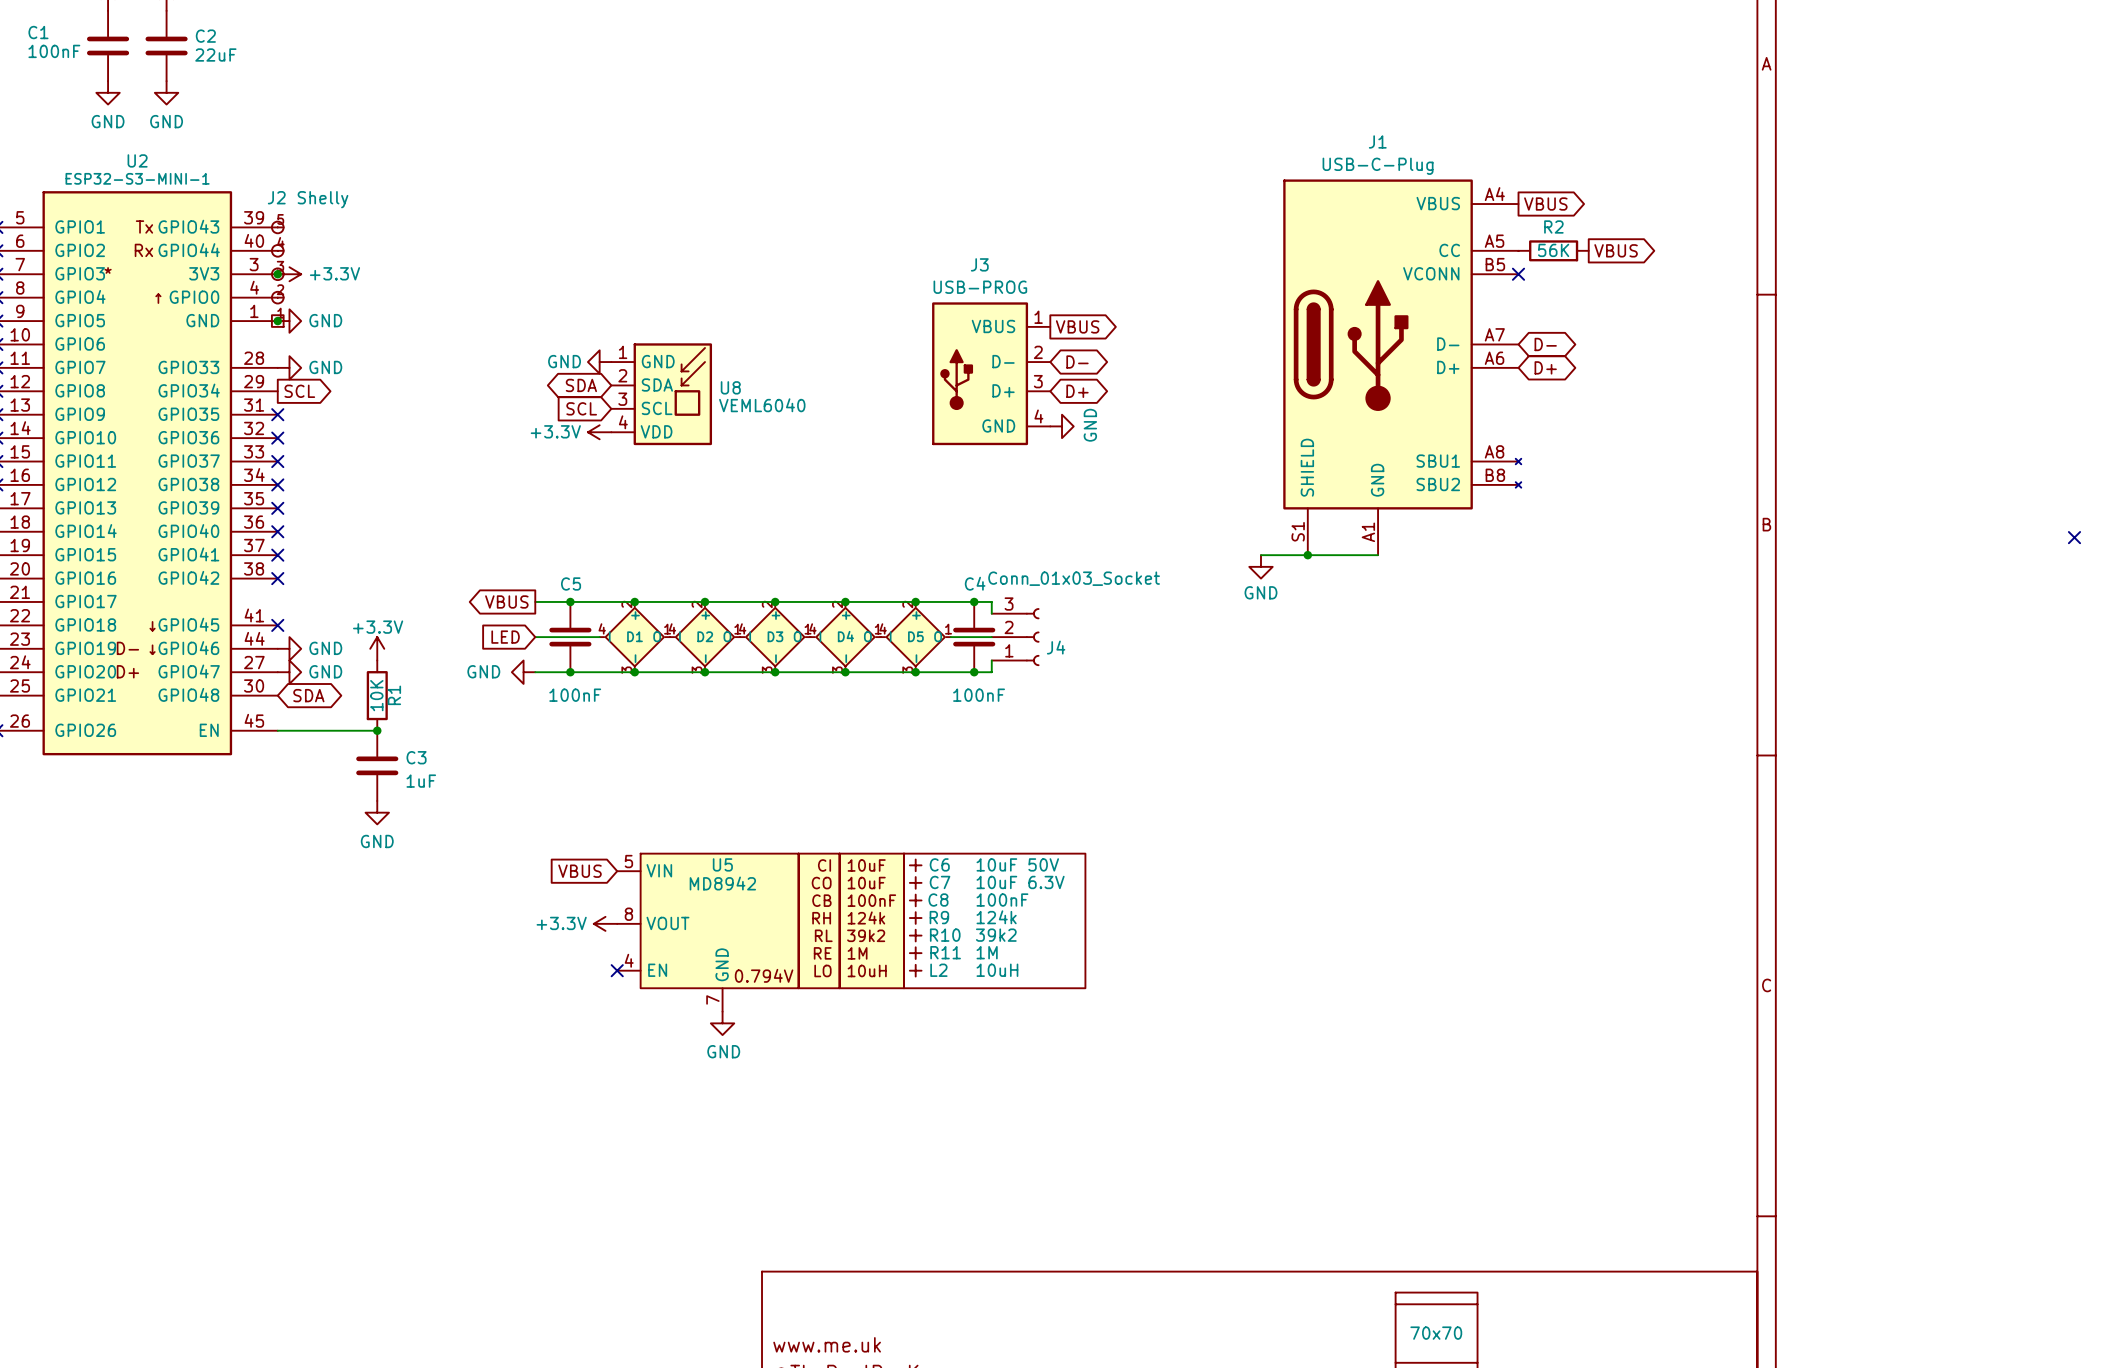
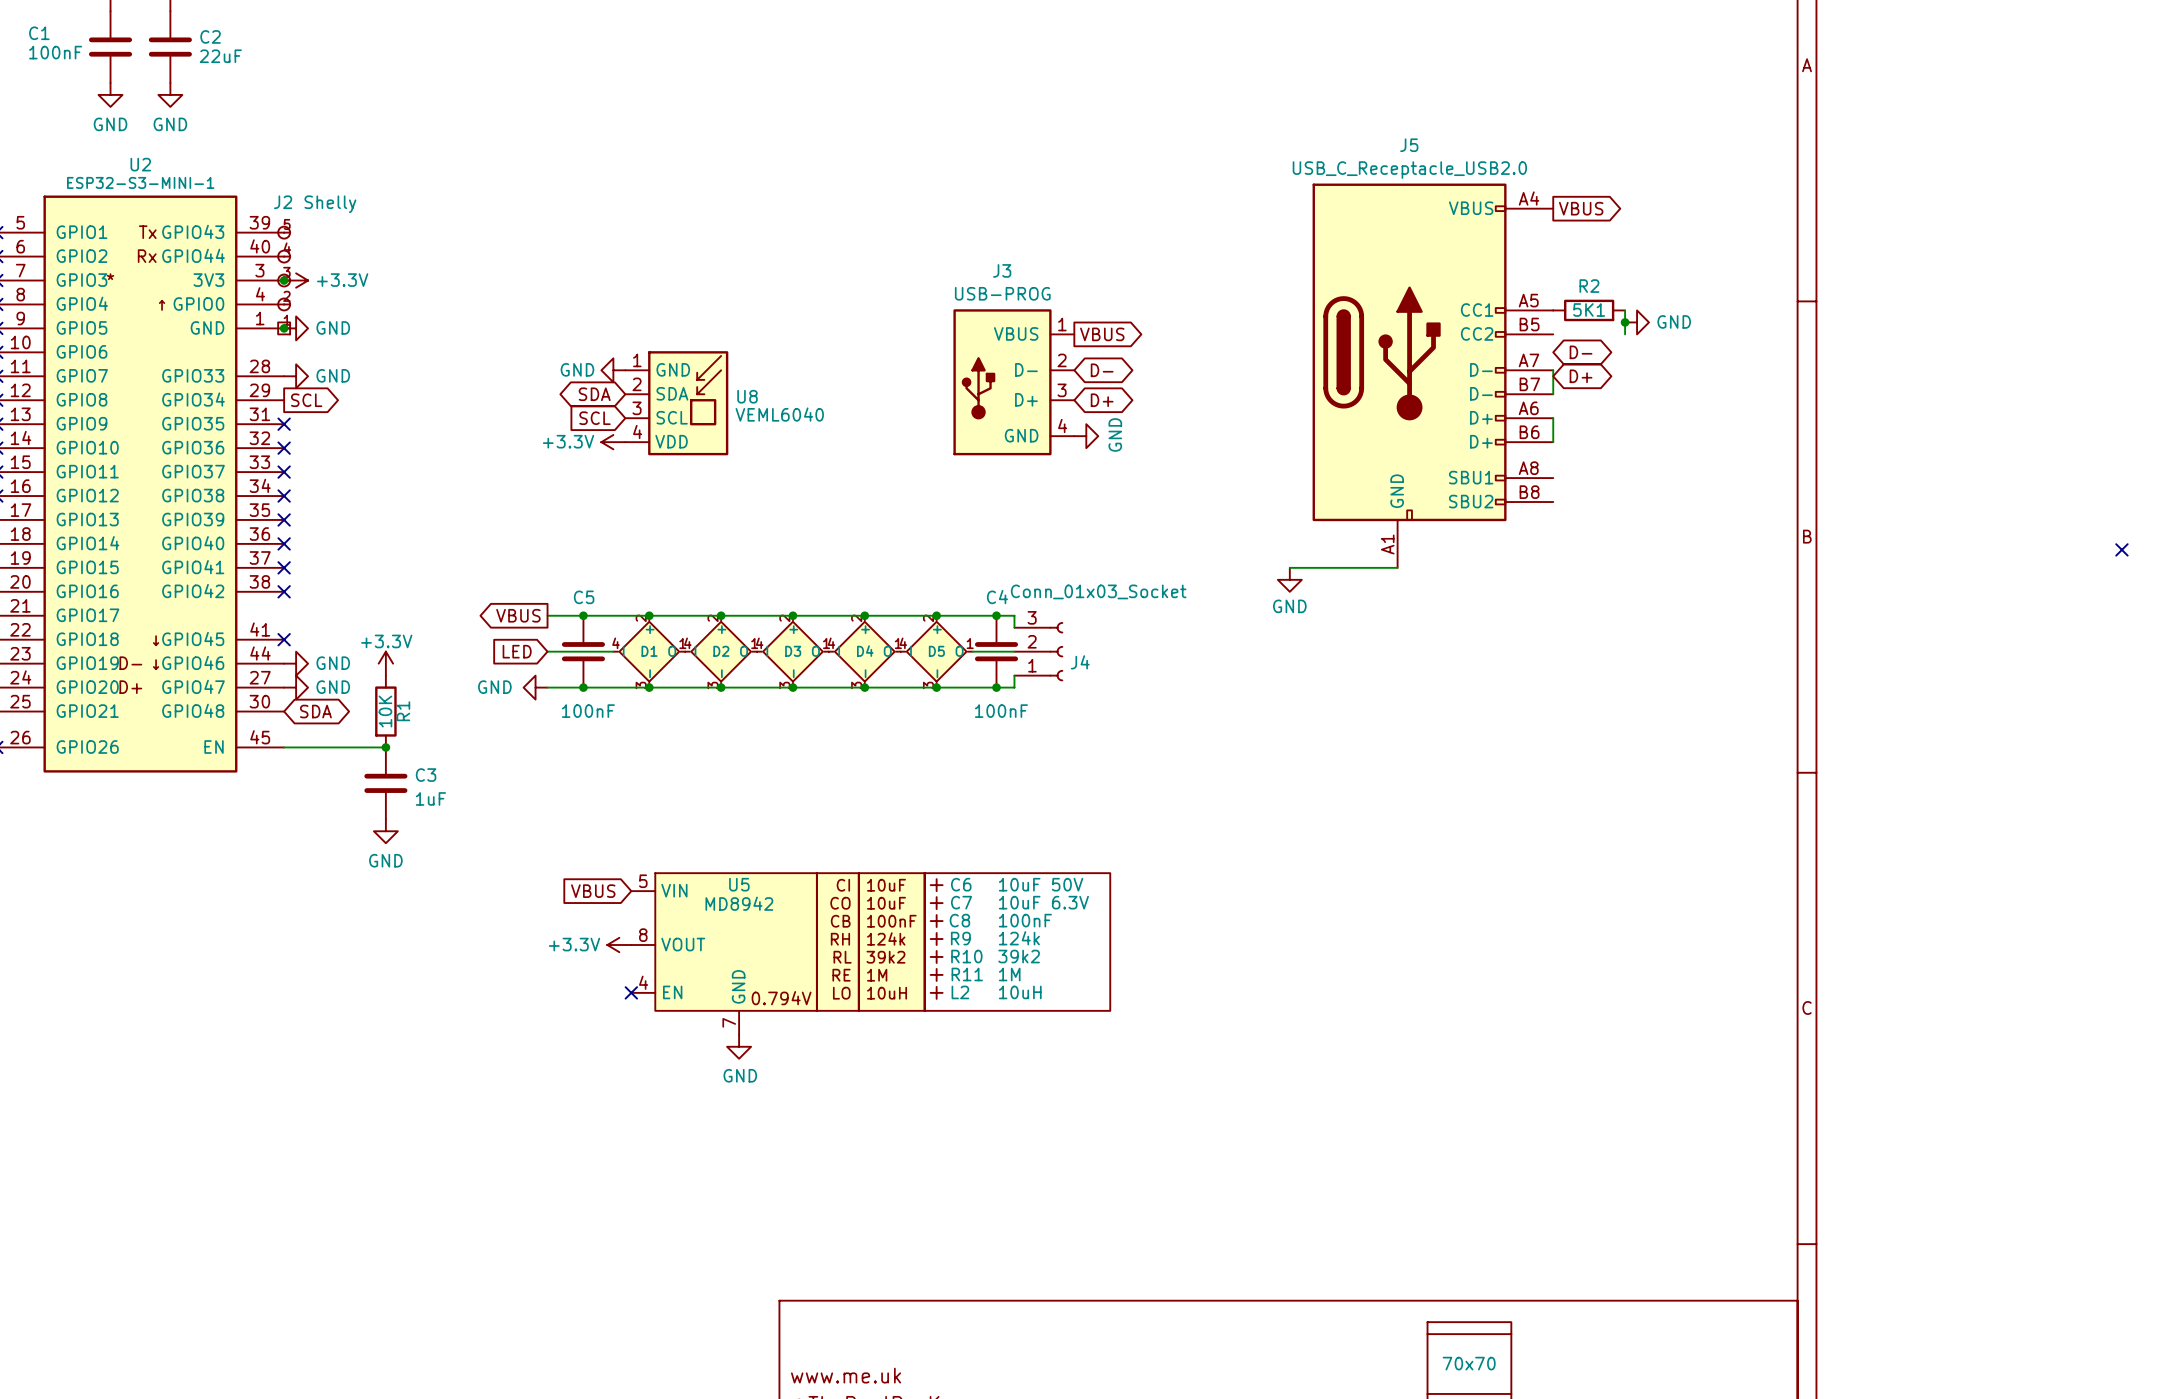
R2 position: (1553, 250) -> (1589, 310)
R2 value: 56K (1553, 250) -> 5K1 (1589, 310)
global label: VBUS (1616, 250) -> none
no-connect mark: (1518, 274) -> none
wire: none -> (1625, 310) (1625, 334)
junction: none -> (1625, 322)
power symbol: none -> GND (1637, 322)
wire: none -> (1553, 370) (1553, 394)
J5: none -> USB_C_Receptacle_USB2.0 (1432, 375)
J1: USB-C-Plug (1402, 367) -> none
wire: none -> (1553, 418) (1553, 442)
junction: (1307, 555) -> none
wire: (1366, 555) (1378, 555) -> none

